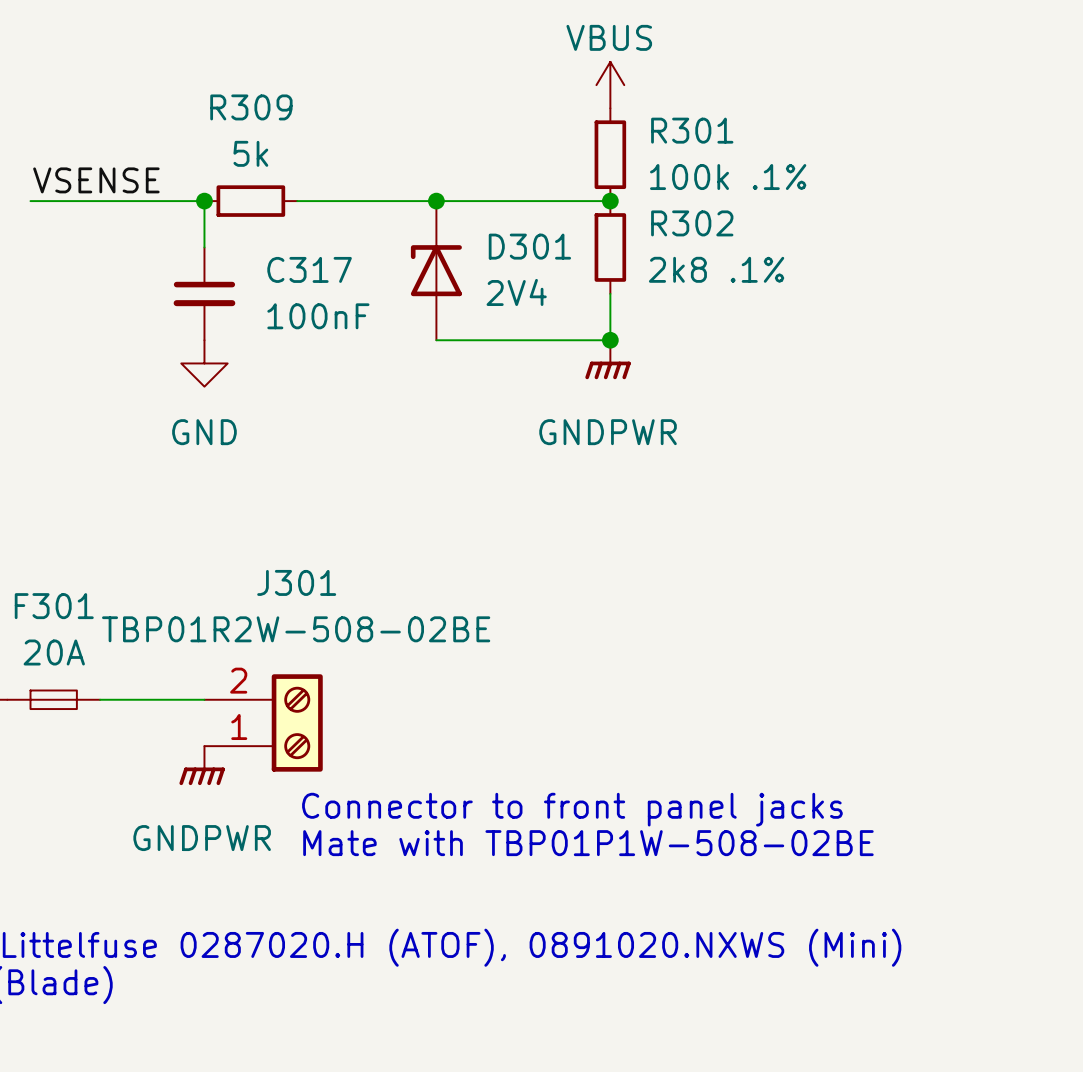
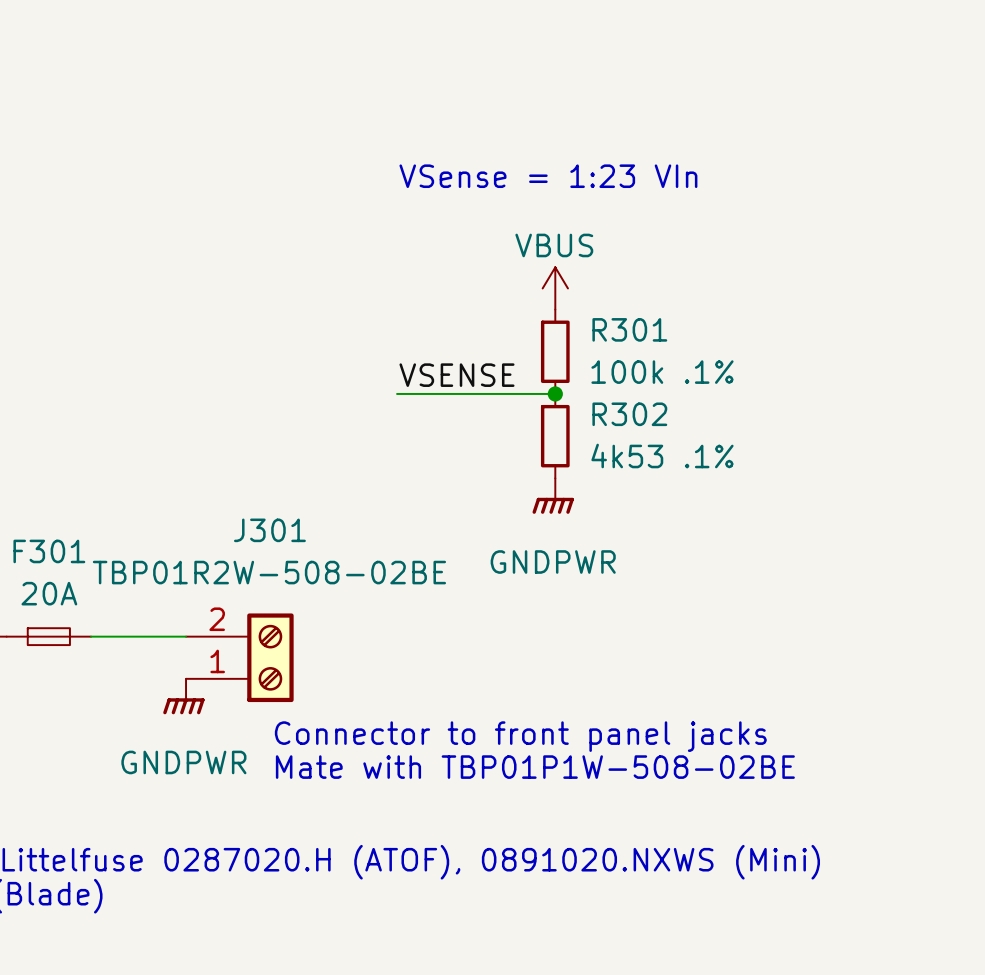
power symbol position: VBUS (610, 85) -> VBUS (555, 288)
R301 position: (610, 154) -> (555, 351)
label: VSENSE (96, 180) -> none
text: none -> VSense = 1:23 VIn (548, 176)
wire: (30, 201) (204, 201) (204, 247) -> none
junction: (204, 201) -> none
R309: 5k (250, 201) -> none
wire: (297, 201) (610, 201) -> none
junction: (436, 201) -> none
junction: (610, 201) -> none
R302 position: (610, 247) -> (555, 436)
R302 value: 2k8 .1% (716, 269) -> 4k53 .1% (662, 455)
D301: 2V4 (436, 270) -> none
C317: 100nF (204, 293) -> none
wire: (610, 293) (610, 340) (436, 340) -> none
junction position: (610, 340) -> (555, 393)
power symbol position: GNDPWR (608, 359) -> GNDPWR (553, 496)
power symbol: GND (204, 363) -> none
label: none -> VSENSE (456, 375)
wire: none -> (397, 393) (555, 393)

